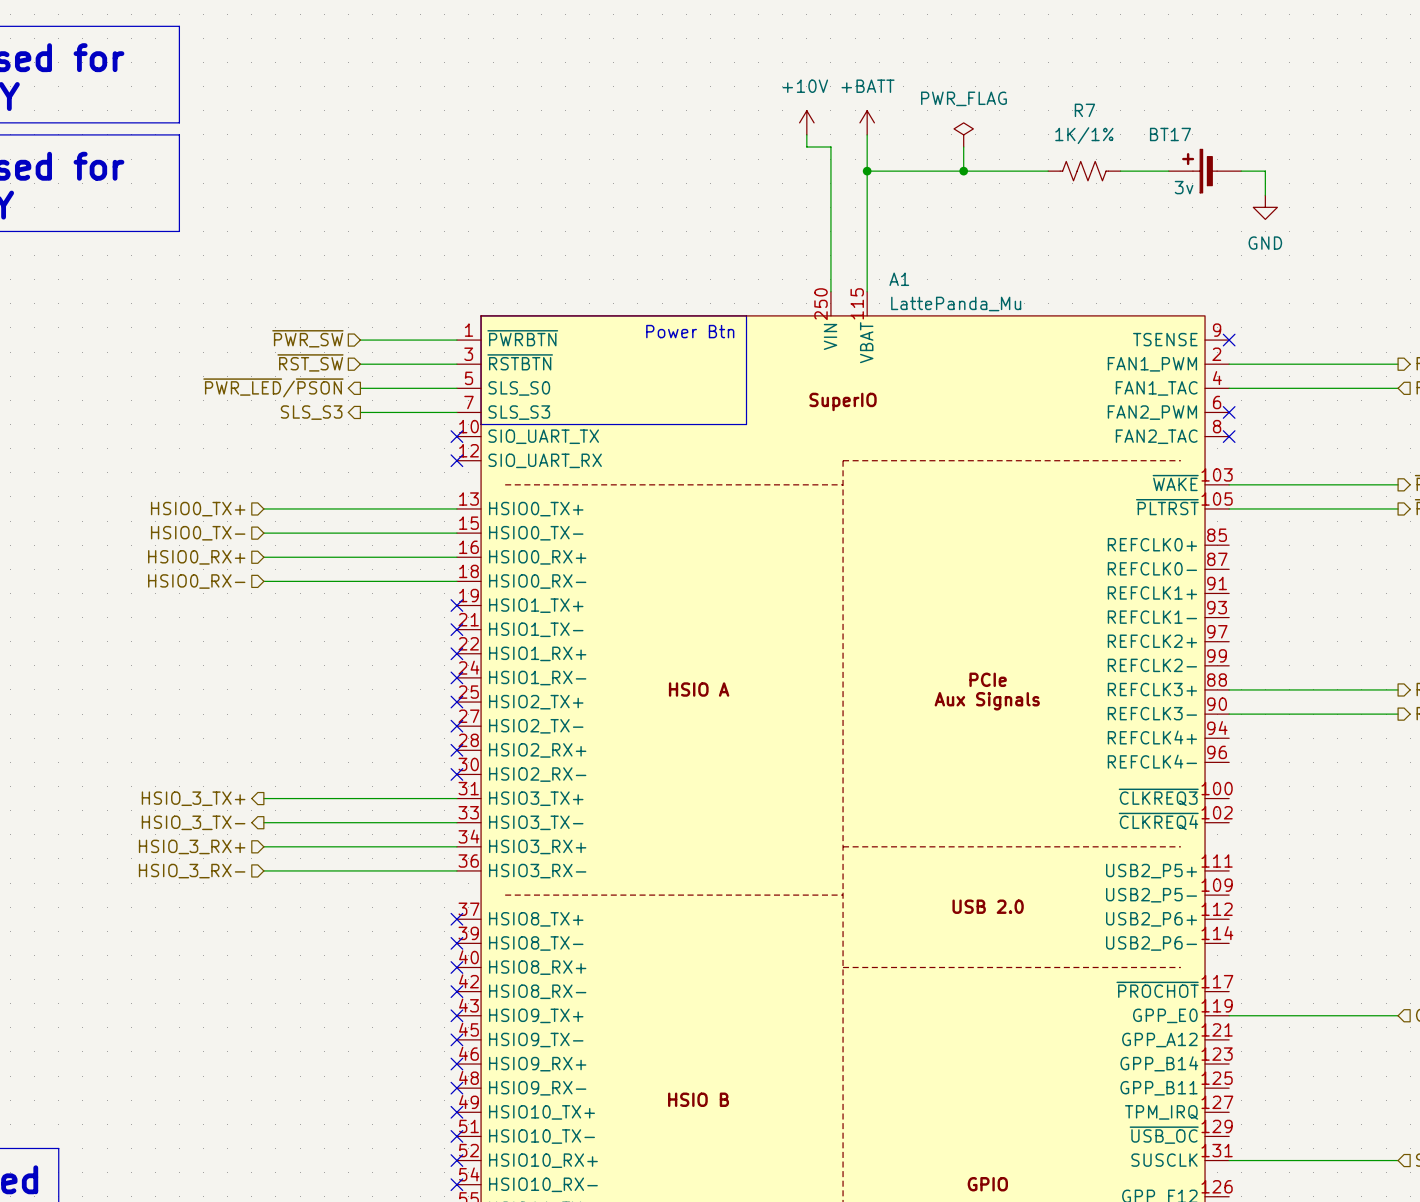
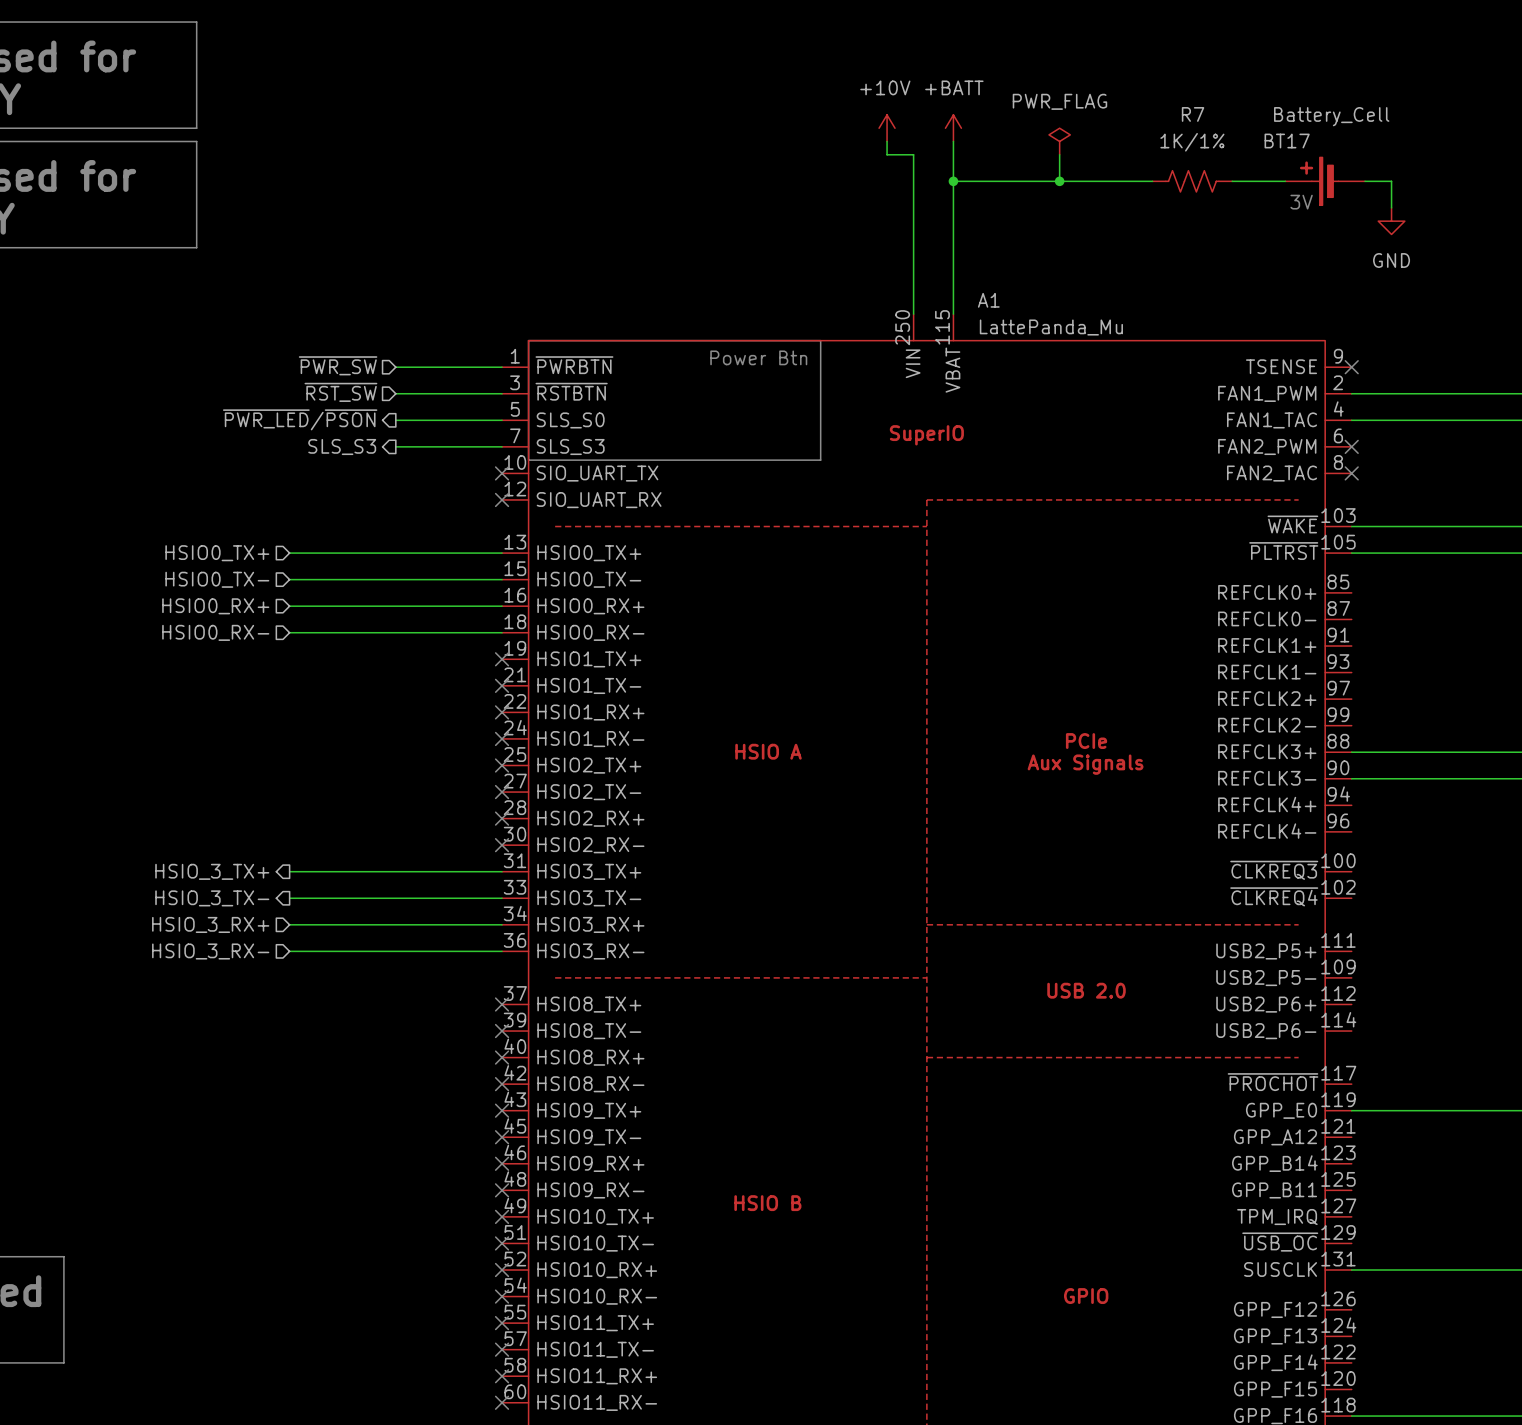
BT17 value: 3v (1184, 187) -> Battery_Cell (1331, 116)
text: none -> 3V (1301, 202)

